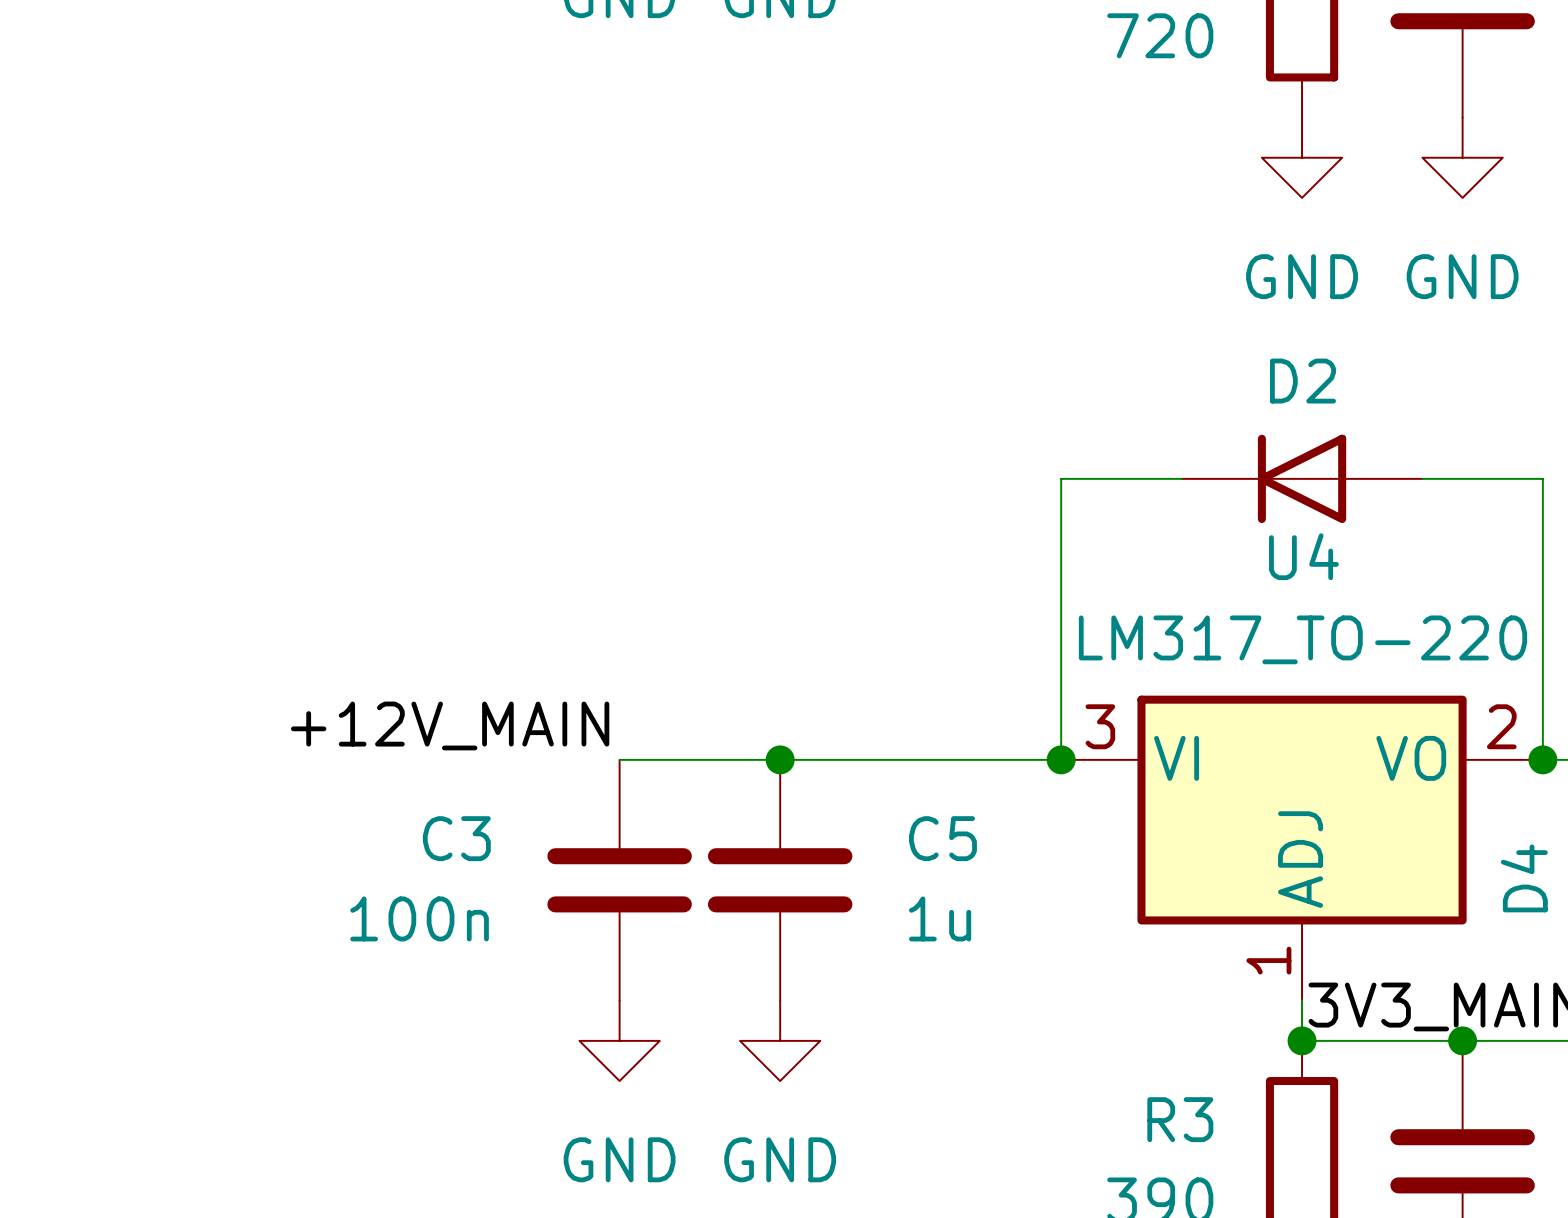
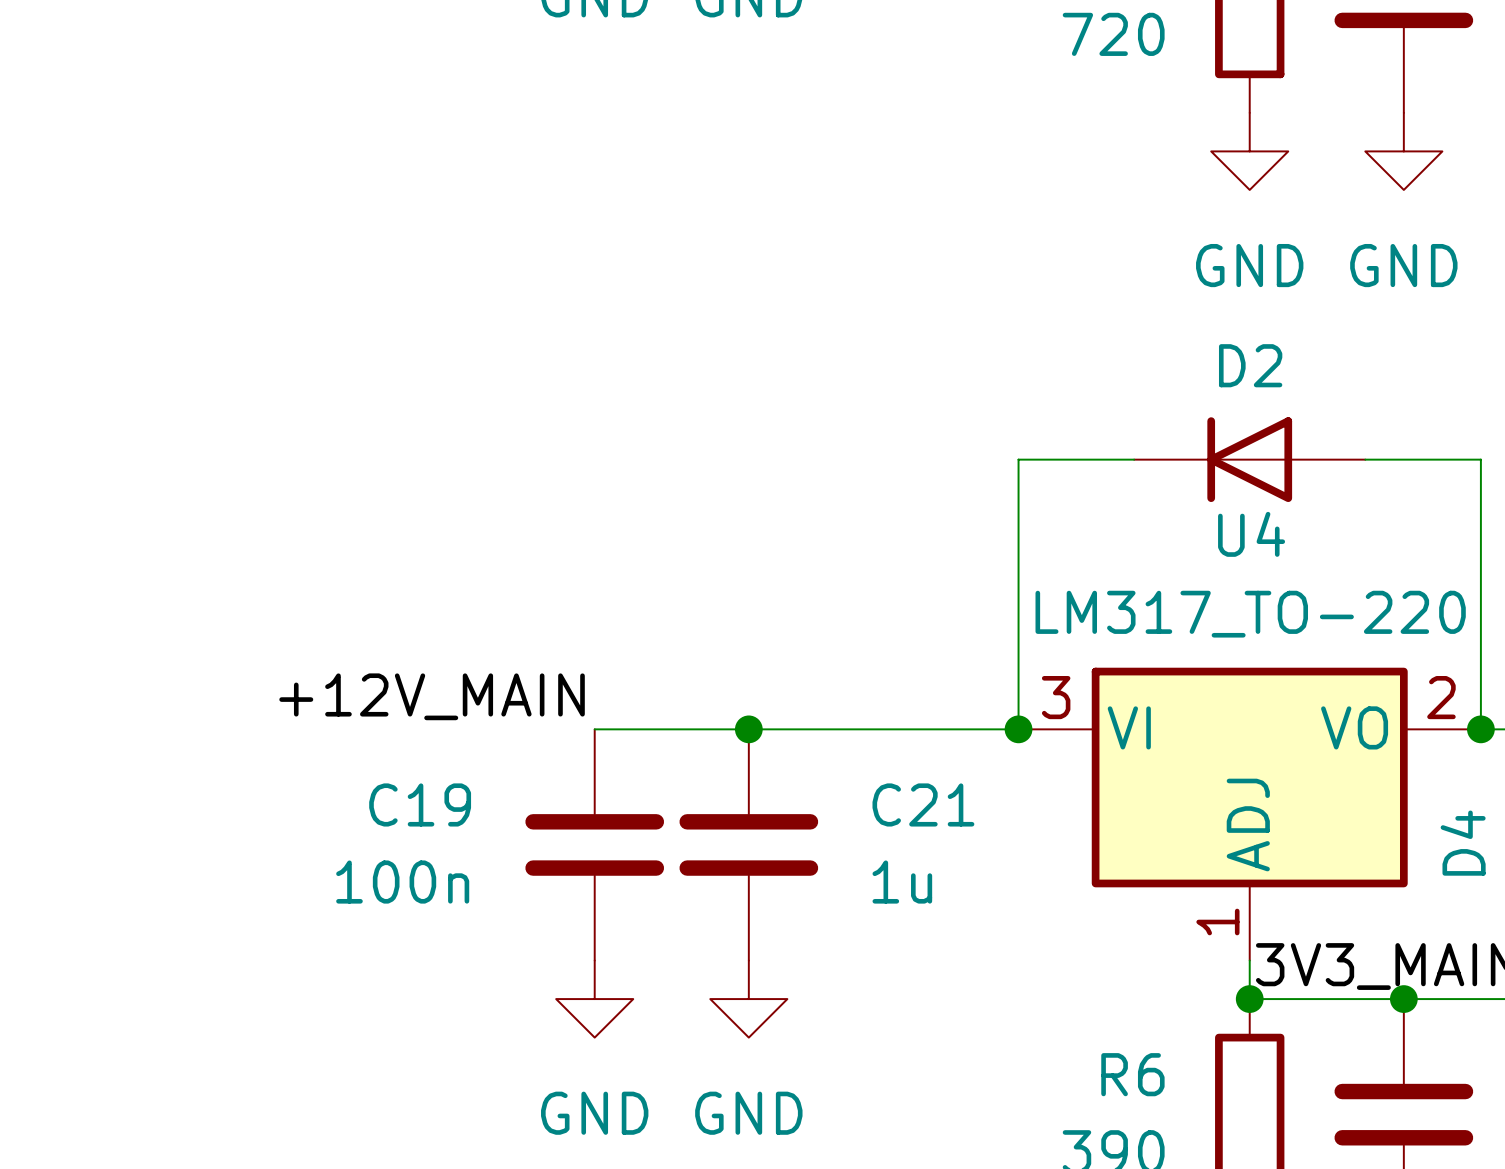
C3 name: C3 (456, 838) -> C19 (420, 804)
C5 name: C5 (942, 838) -> C21 (923, 804)
R3 name: R3 (1180, 1119) -> R6 (1132, 1074)

